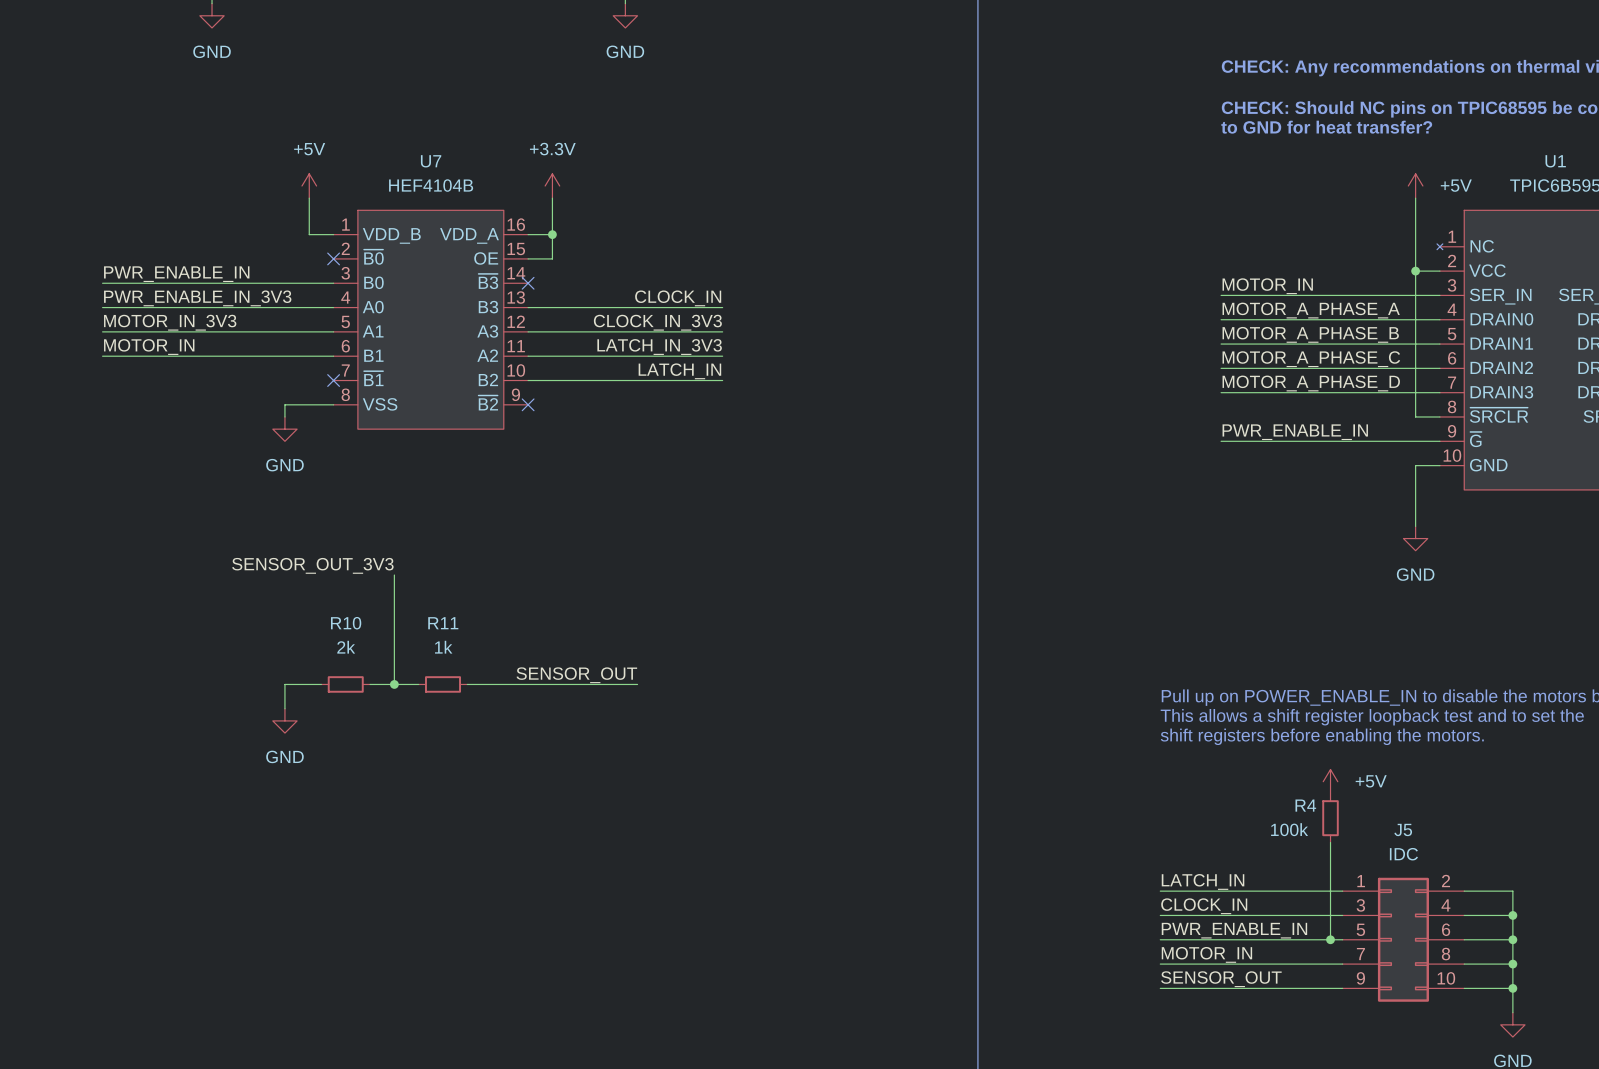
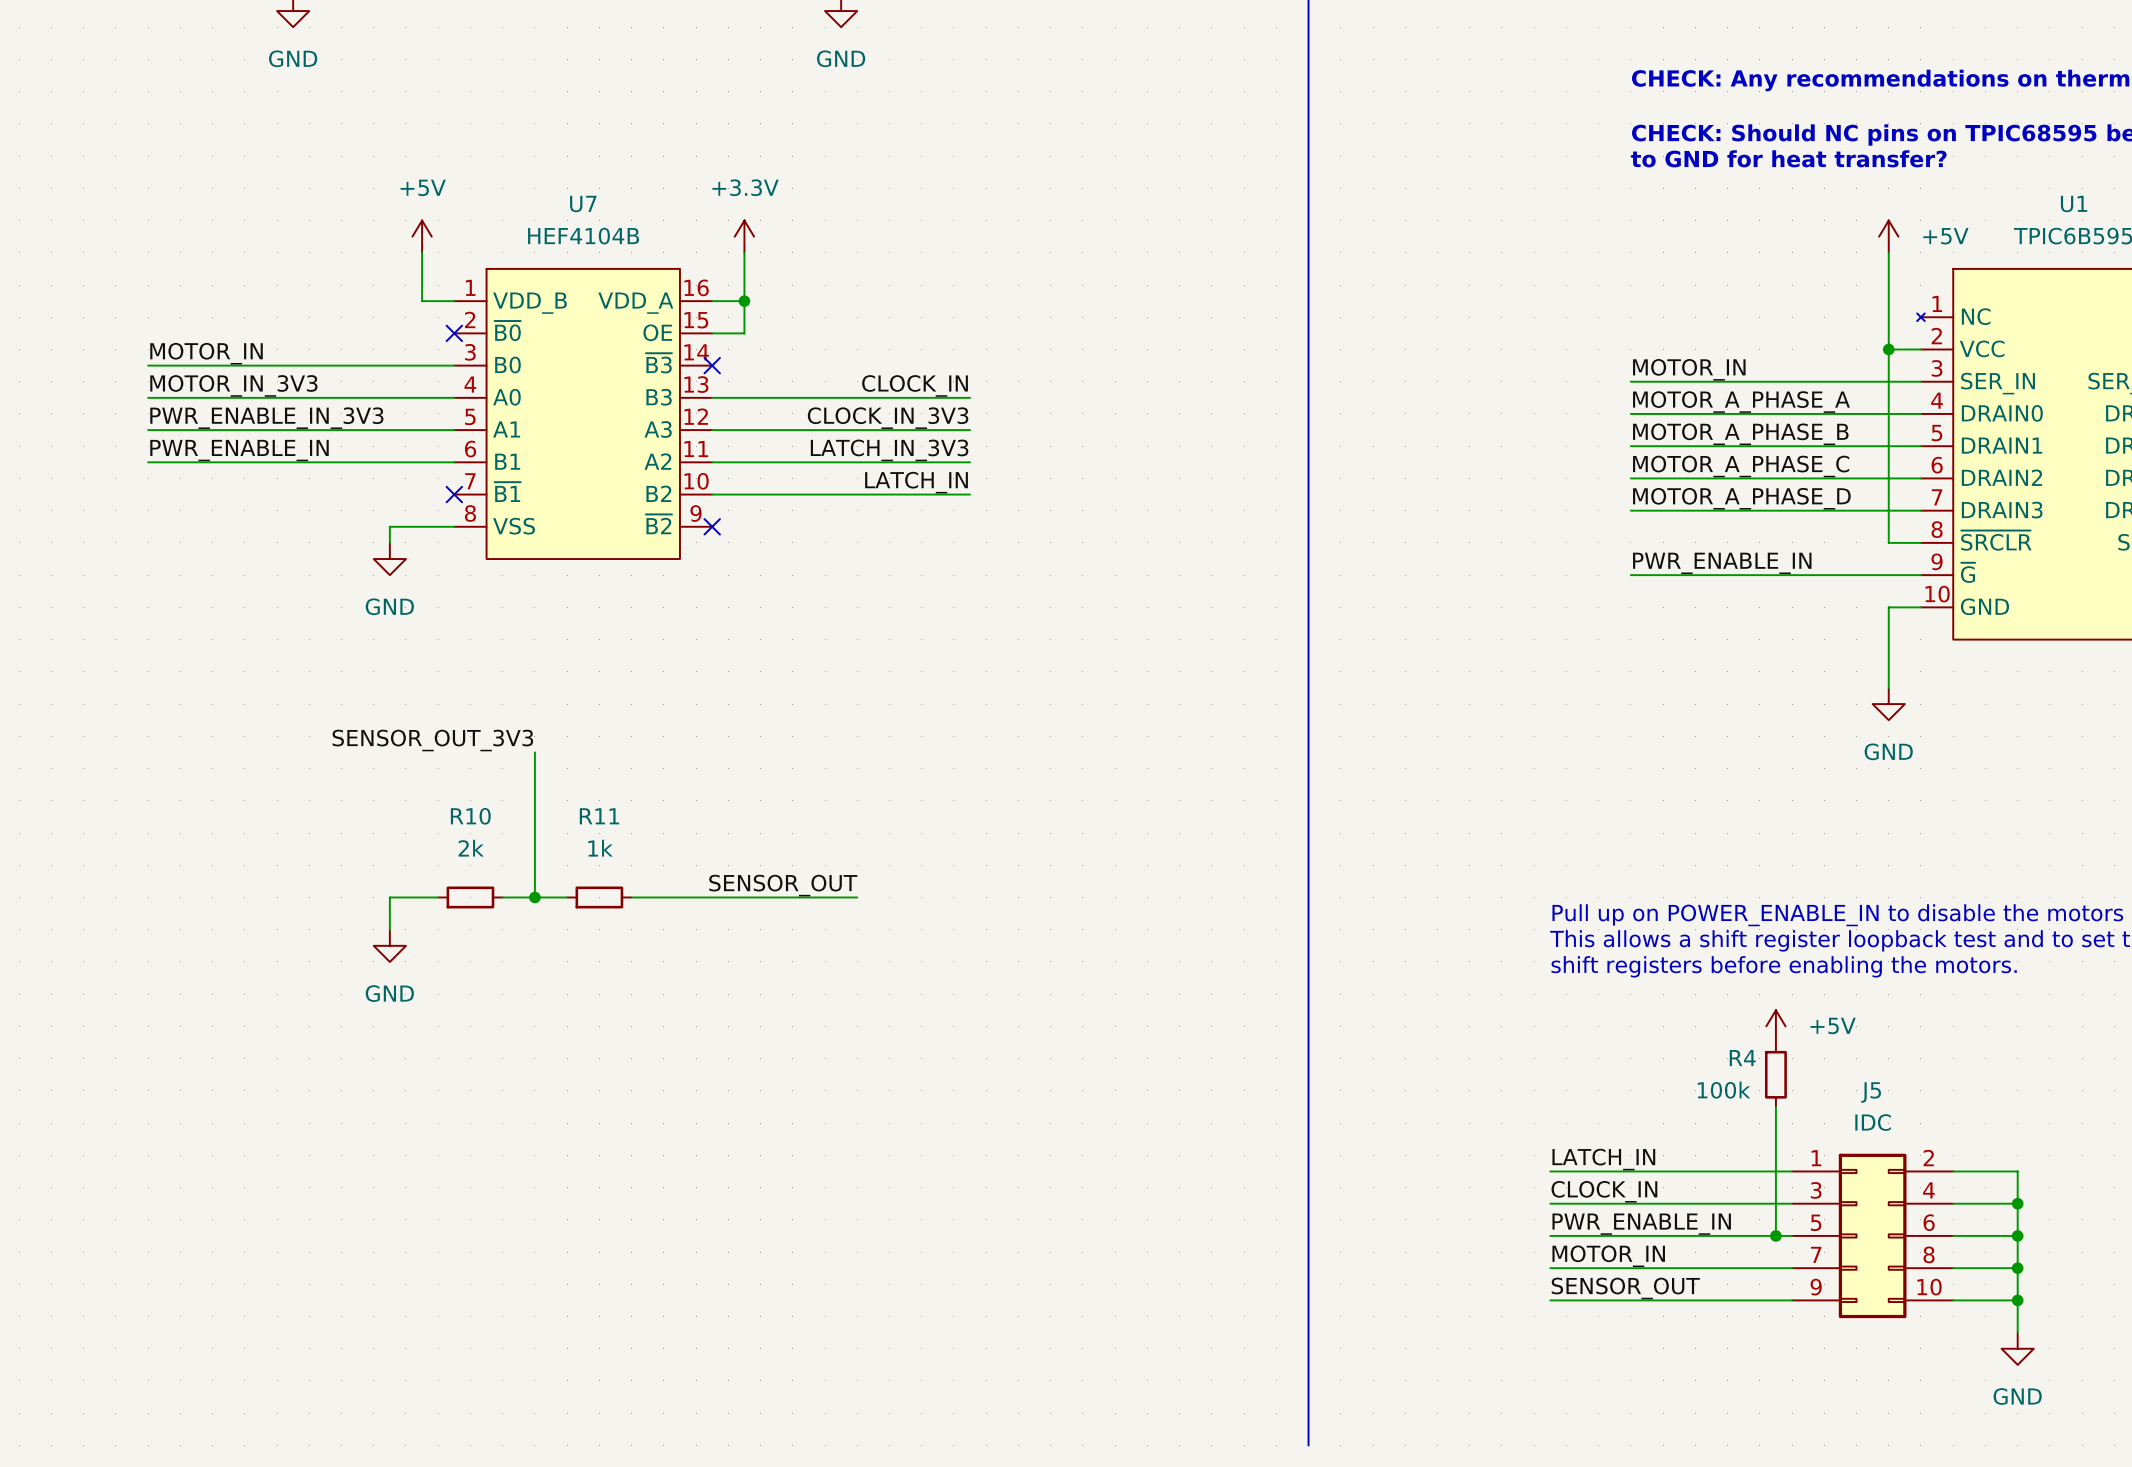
label: PWR_ENABLE_IN (176, 274) -> MOTOR_IN (206, 353)
label: PWR_ENABLE_IN_3V3 (197, 298) -> MOTOR_IN_3V3 (233, 385)
label: MOTOR_IN_3V3 (170, 322) -> PWR_ENABLE_IN_3V3 (266, 418)
label: MOTOR_IN (149, 347) -> PWR_ENABLE_IN (239, 450)

